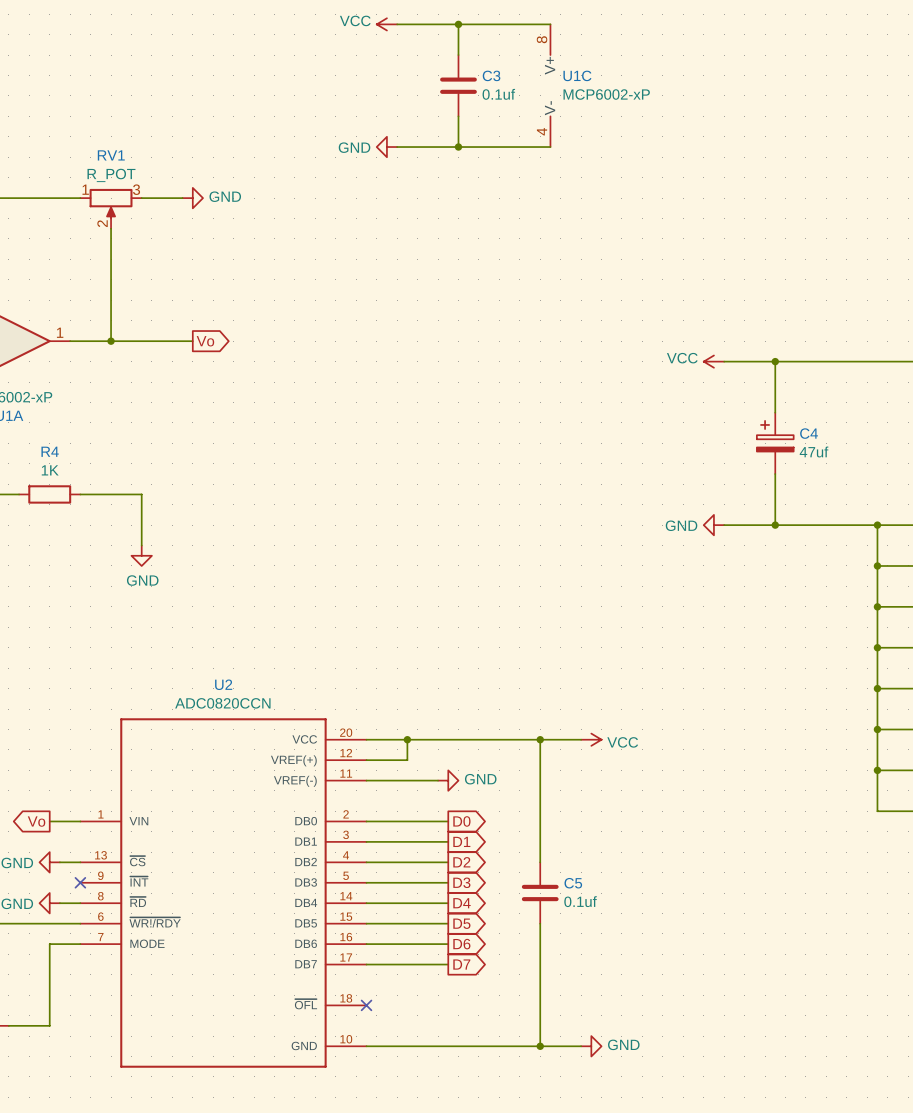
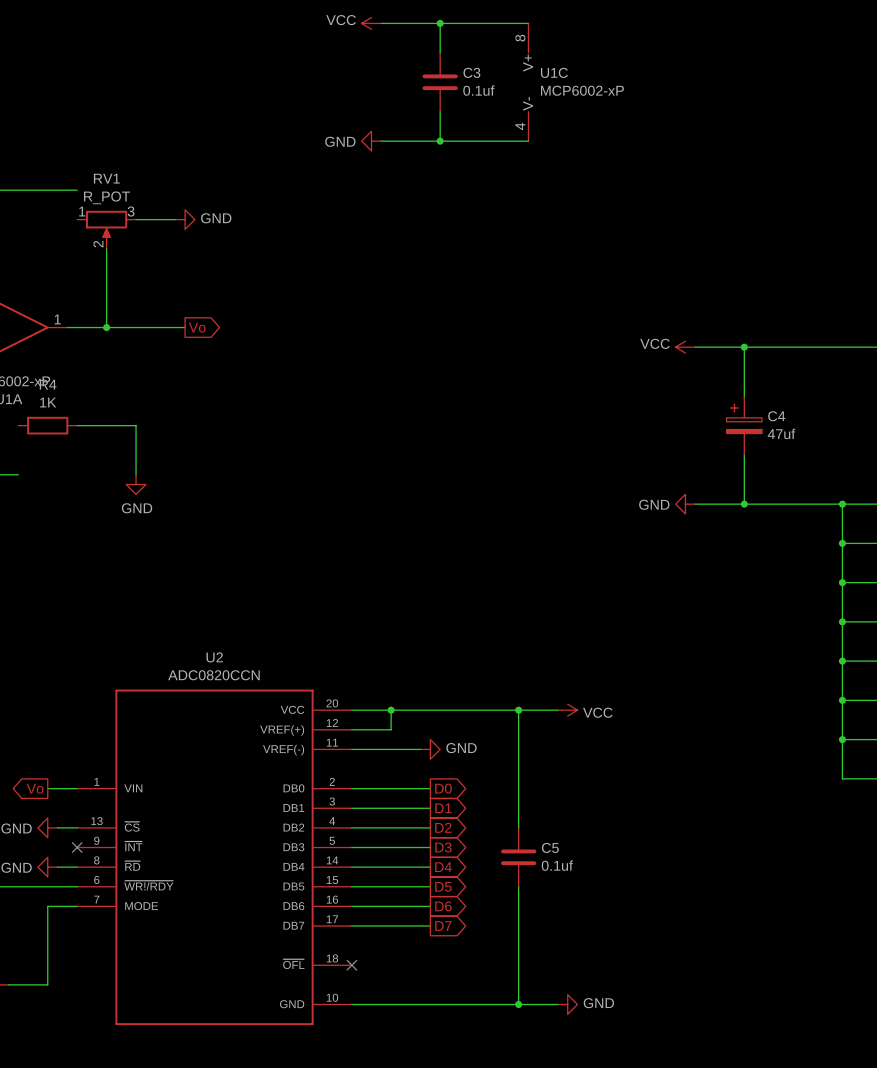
wire: (141, 198) (182, 198) -> (136, 219) (175, 219)
power symbol position: GND (192, 198) -> GND (185, 219)
RV1 position: (111, 208) -> (106, 229)
R4 position: (49, 494) -> (47, 425)
wire: (80, 494) (141, 494) (141, 545) -> (77, 425) (136, 425) (136, 474)
power symbol position: GND (141, 555) -> GND (136, 484)

